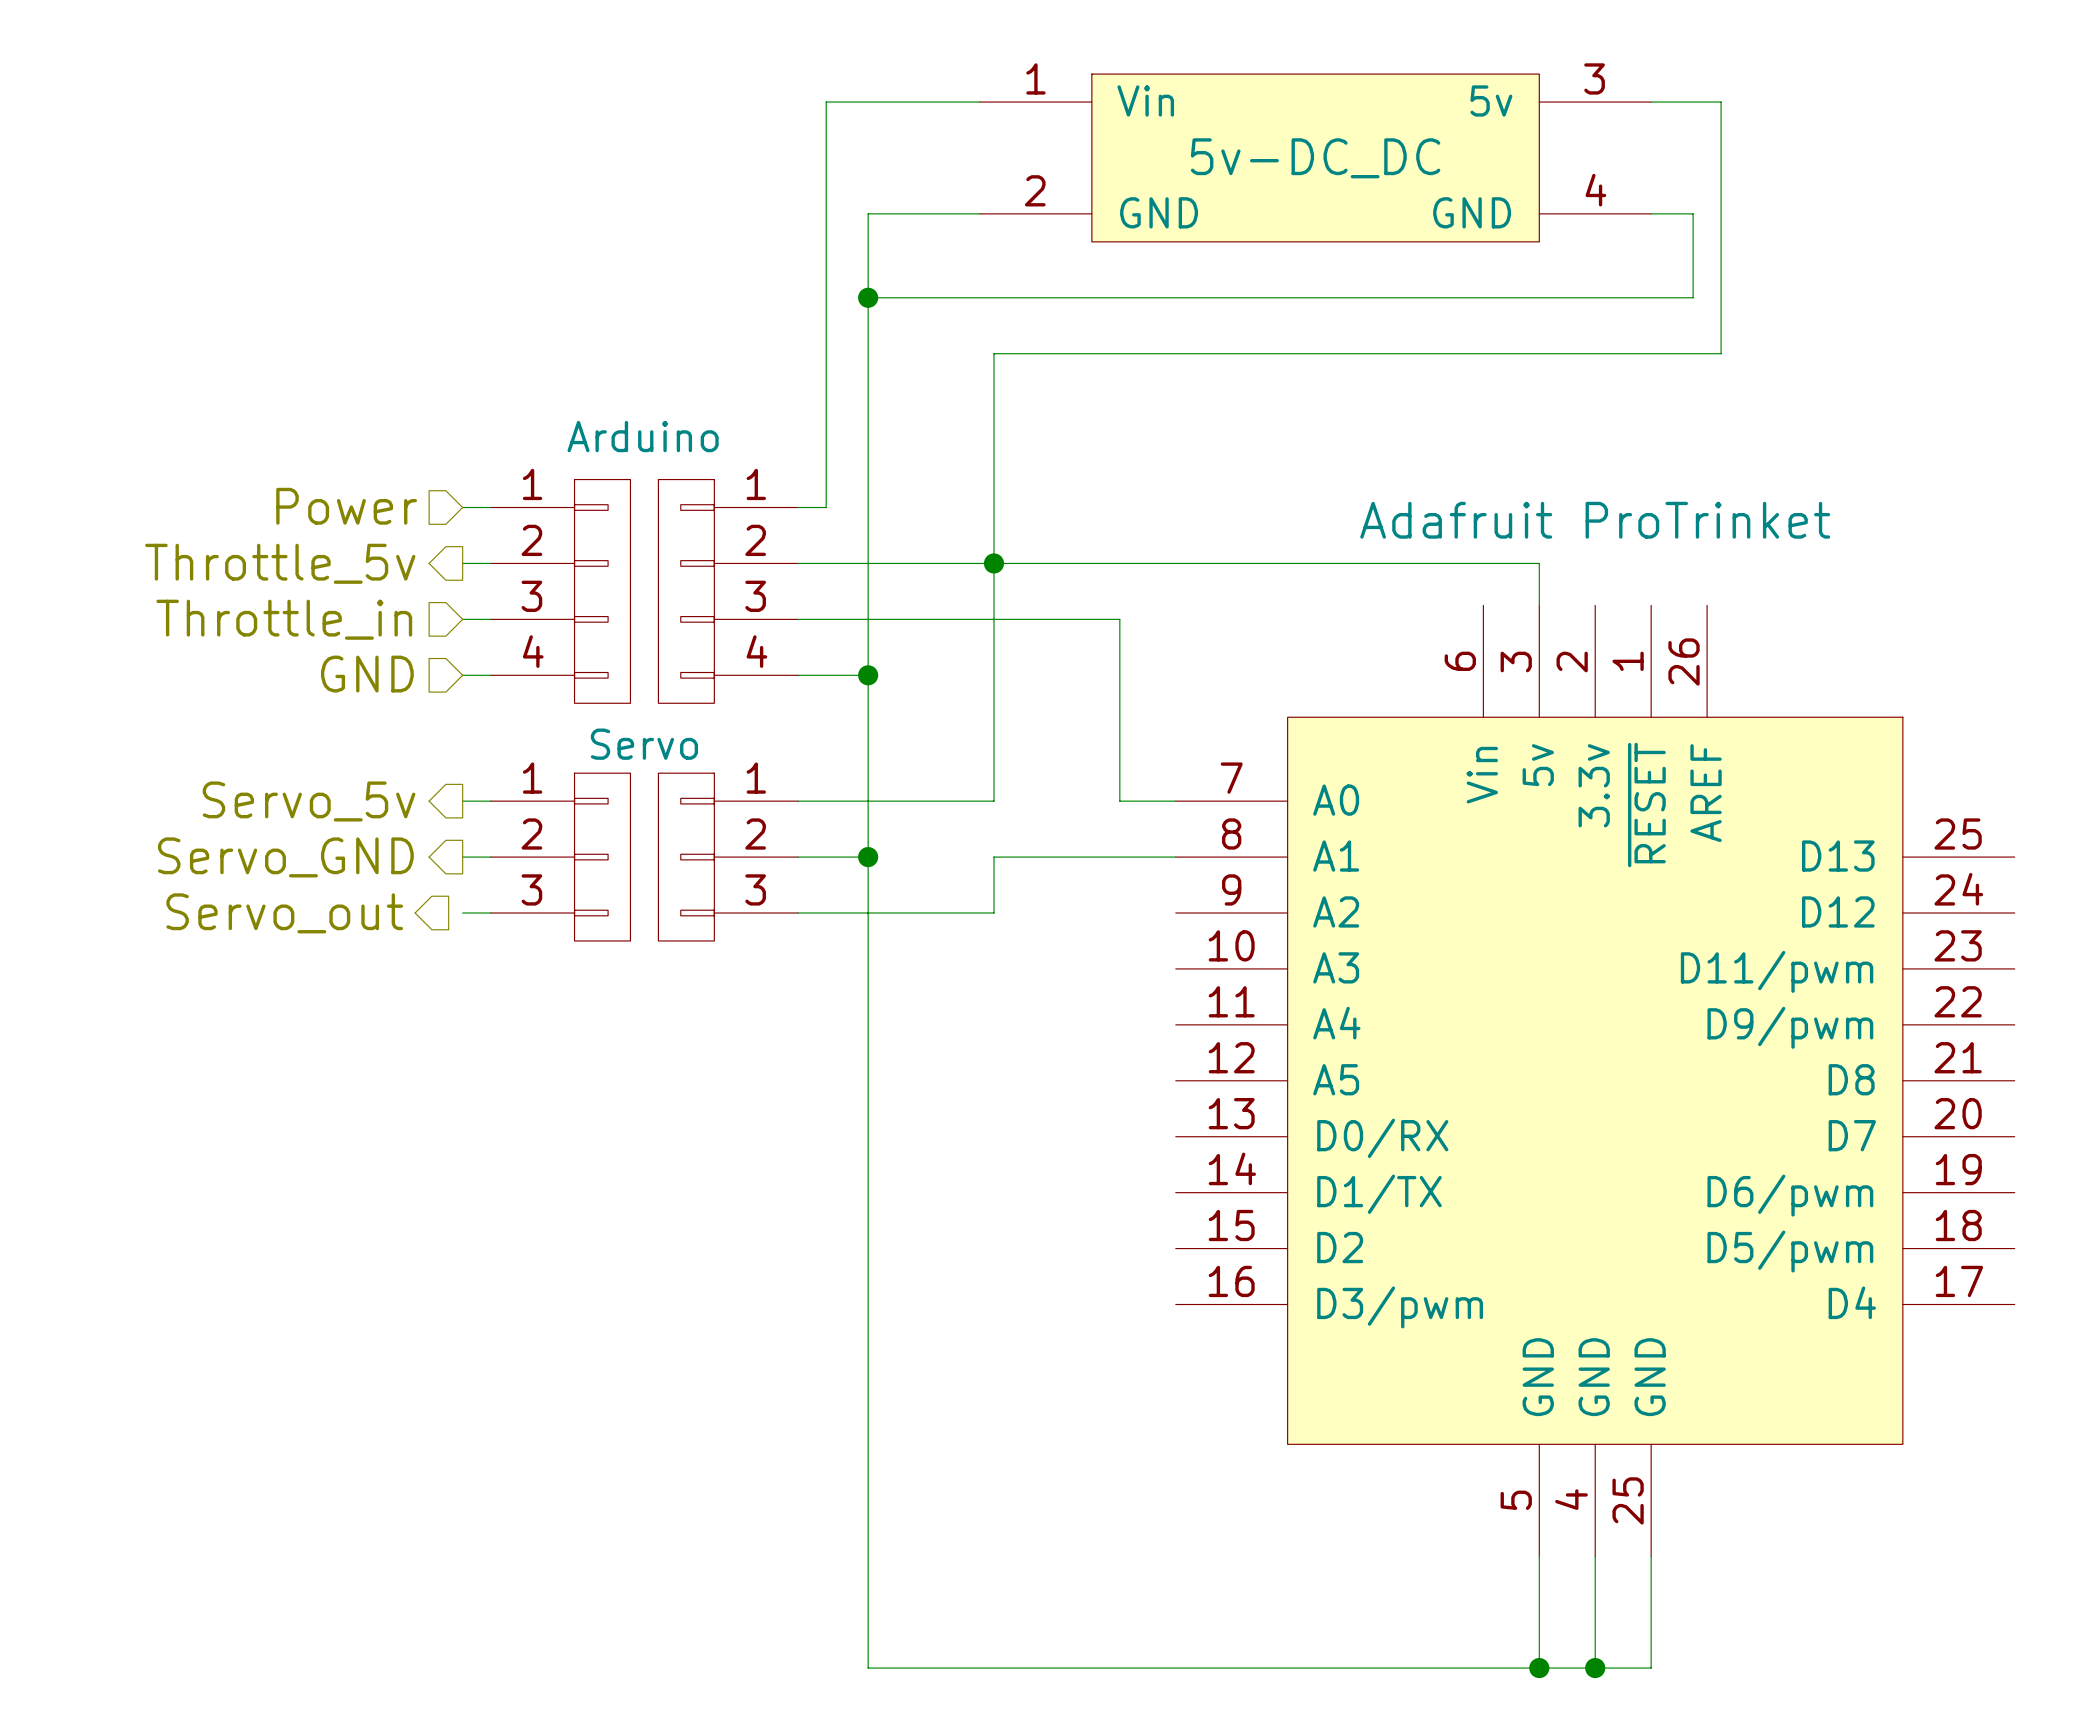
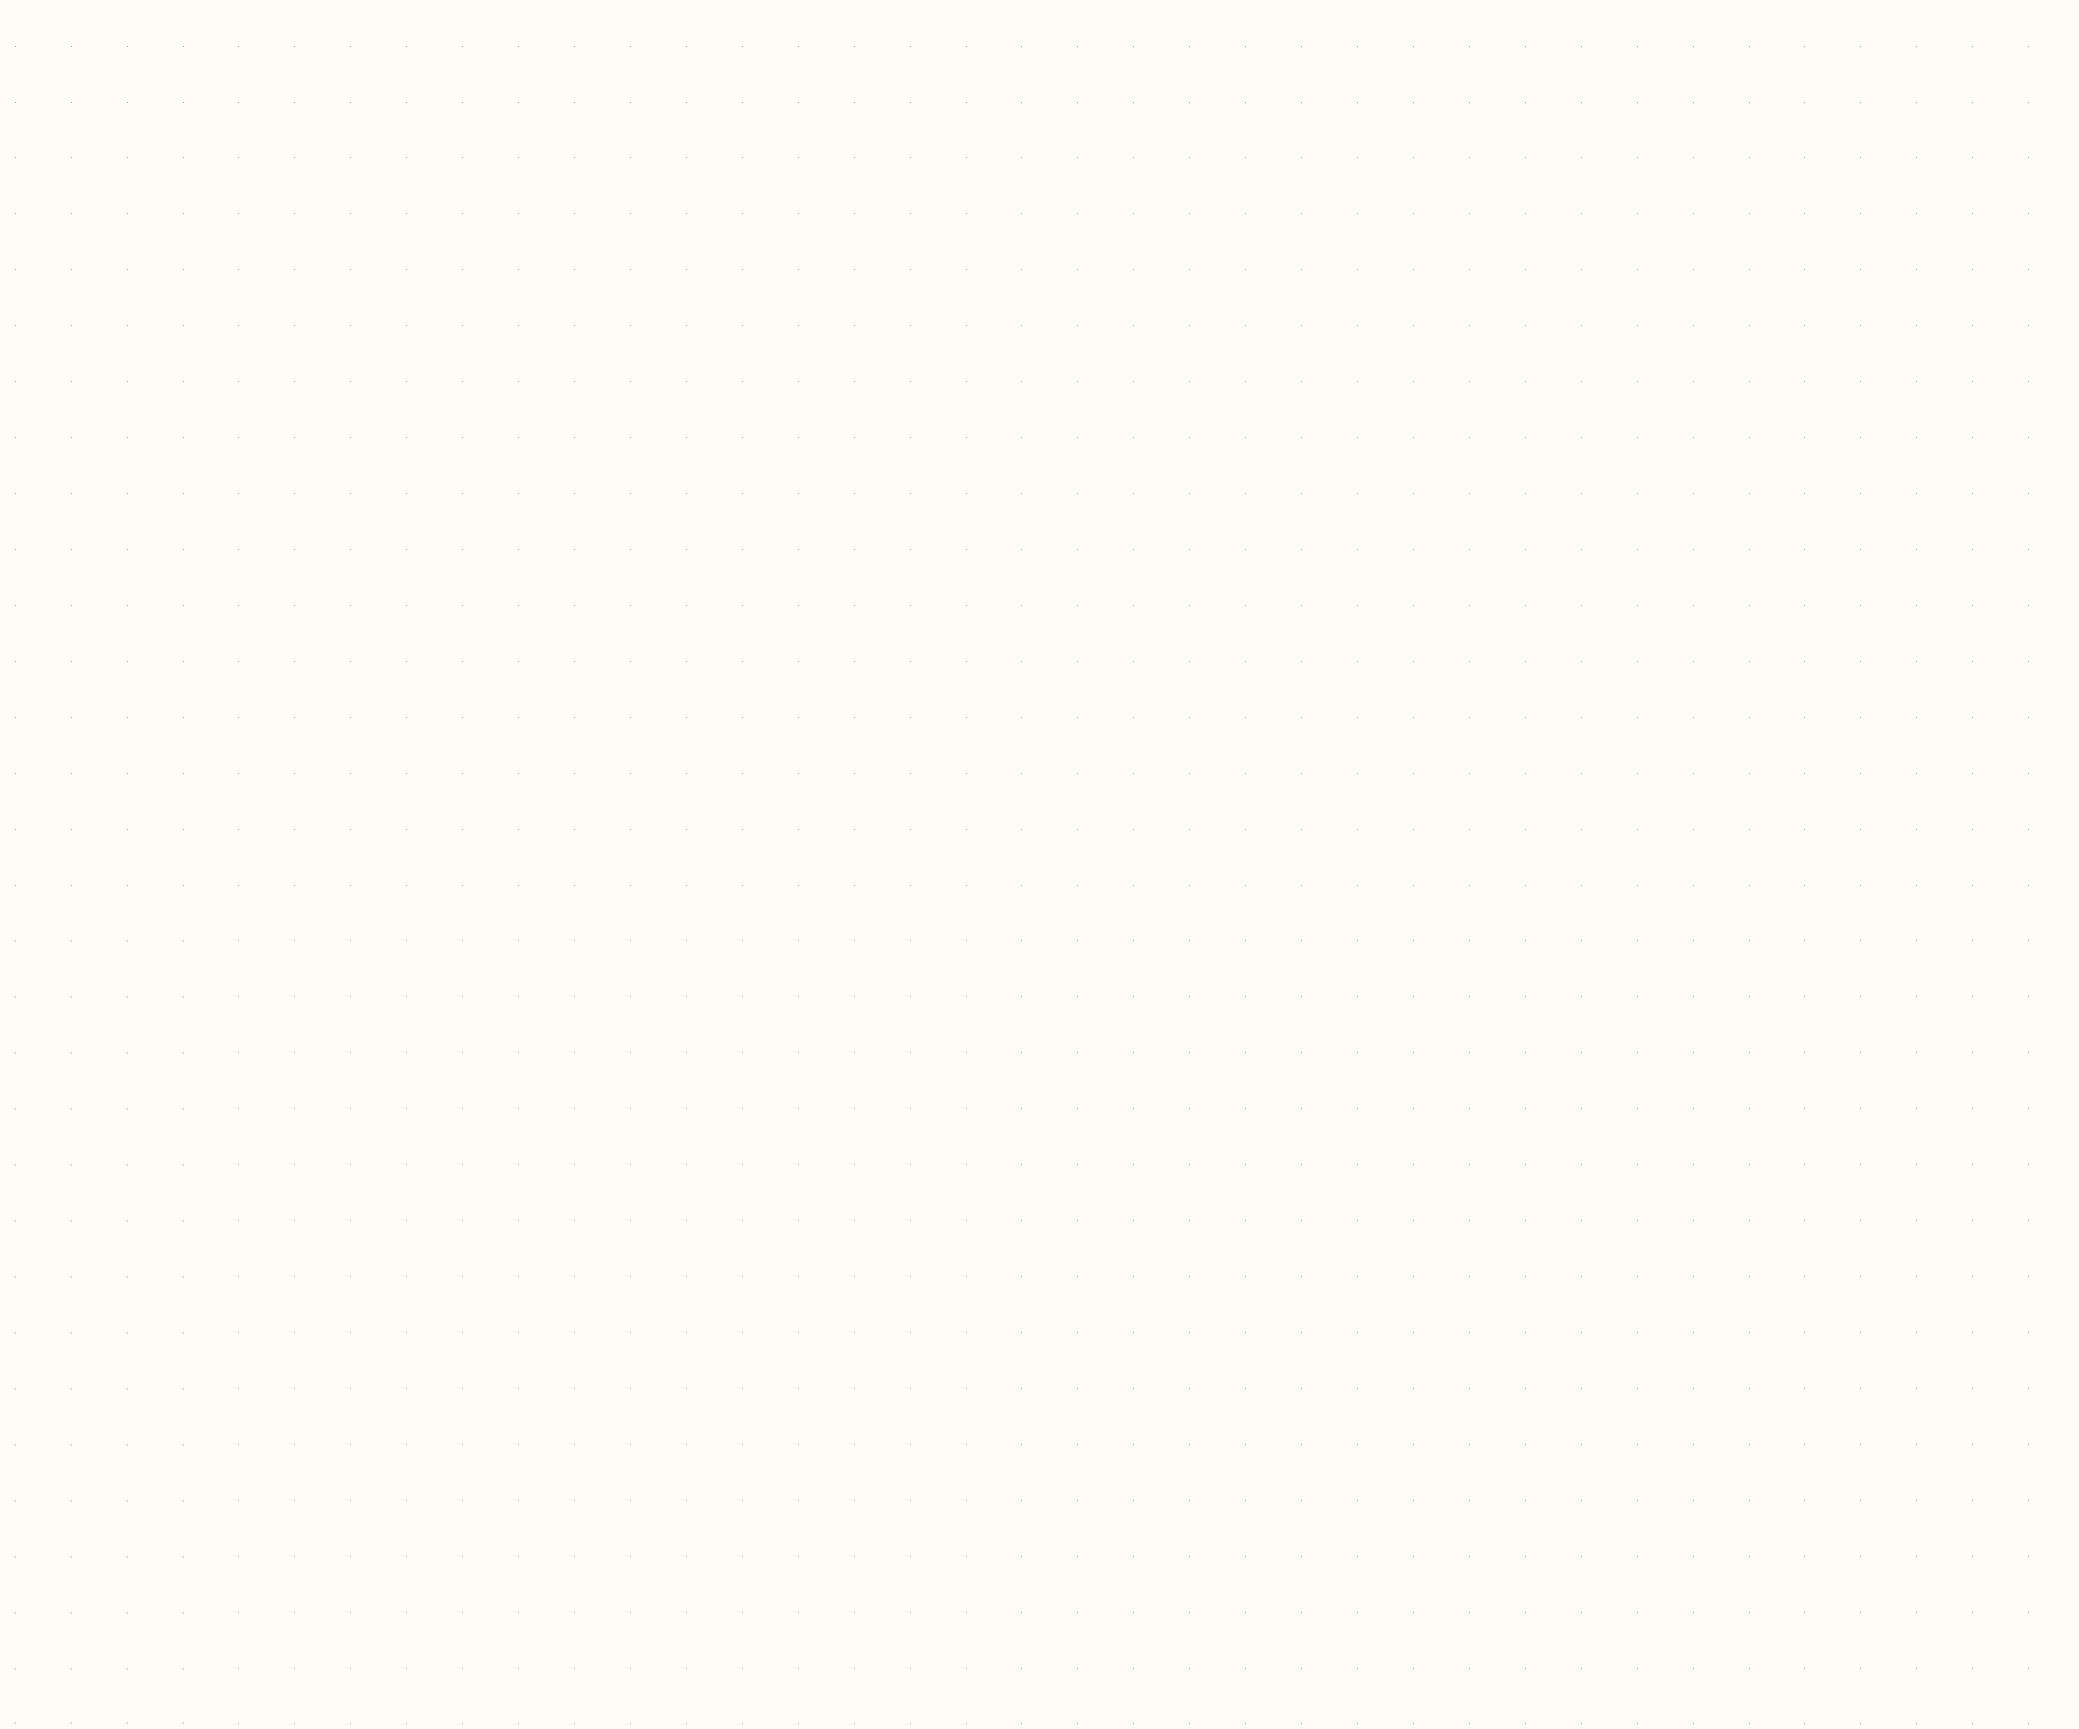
wire: (980, 102) (826, 102) (826, 507) (798, 507) -> none
wire: (1651, 102) (1721, 102) (1721, 353) (993, 353) (993, 801) (798, 801) -> none
part: 5v-DC_DC (1315, 157) -> none
wire: (980, 213) (868, 213) (868, 1668) (1651, 1668) (1651, 1556) -> none
wire: (1651, 213) (1693, 213) (1693, 297) (868, 297) -> none
junction: (868, 297) -> none
hierarchical label: Power (346, 506) -> none
wire: (462, 507) (490, 507) -> none
hierarchical label: Throttle_5v (280, 563) -> none
wire: (462, 563) (490, 563) -> none
wire: (798, 563) (1539, 563) (1539, 605) -> none
junction: (993, 563) -> none
part: Arduino (560, 591) -> none
part: (728, 591) -> none
hierarchical label: Throttle_in (284, 619) -> none
wire: (462, 619) (490, 619) -> none
wire: (798, 619) (1119, 619) (1119, 801) (1175, 801) -> none
hierarchical label: GND (367, 674) -> none
wire: (462, 675) (490, 675) -> none
wire: (798, 675) (868, 675) -> none
junction: (868, 675) -> none
hierarchical label: Servo_5v (309, 801) -> none
wire: (462, 801) (490, 801) -> none
hierarchical label: Servo_GND (285, 857) -> none
wire: (462, 857) (490, 857) -> none
part: Servo (560, 857) -> none
part: (728, 857) -> none
wire: (798, 857) (868, 857) -> none
junction: (868, 857) -> none
wire: (1175, 857) (993, 857) (993, 913) (798, 913) -> none
hierarchical label: Servo_out (284, 913) -> none
wire: (462, 913) (490, 913) -> none
part: Adafruit ProTrinket (1595, 1080) -> none
wire: (1539, 1556) (1539, 1668) -> none
wire: (1595, 1556) (1595, 1668) -> none
junction: (1539, 1668) -> none
junction: (1595, 1668) -> none

